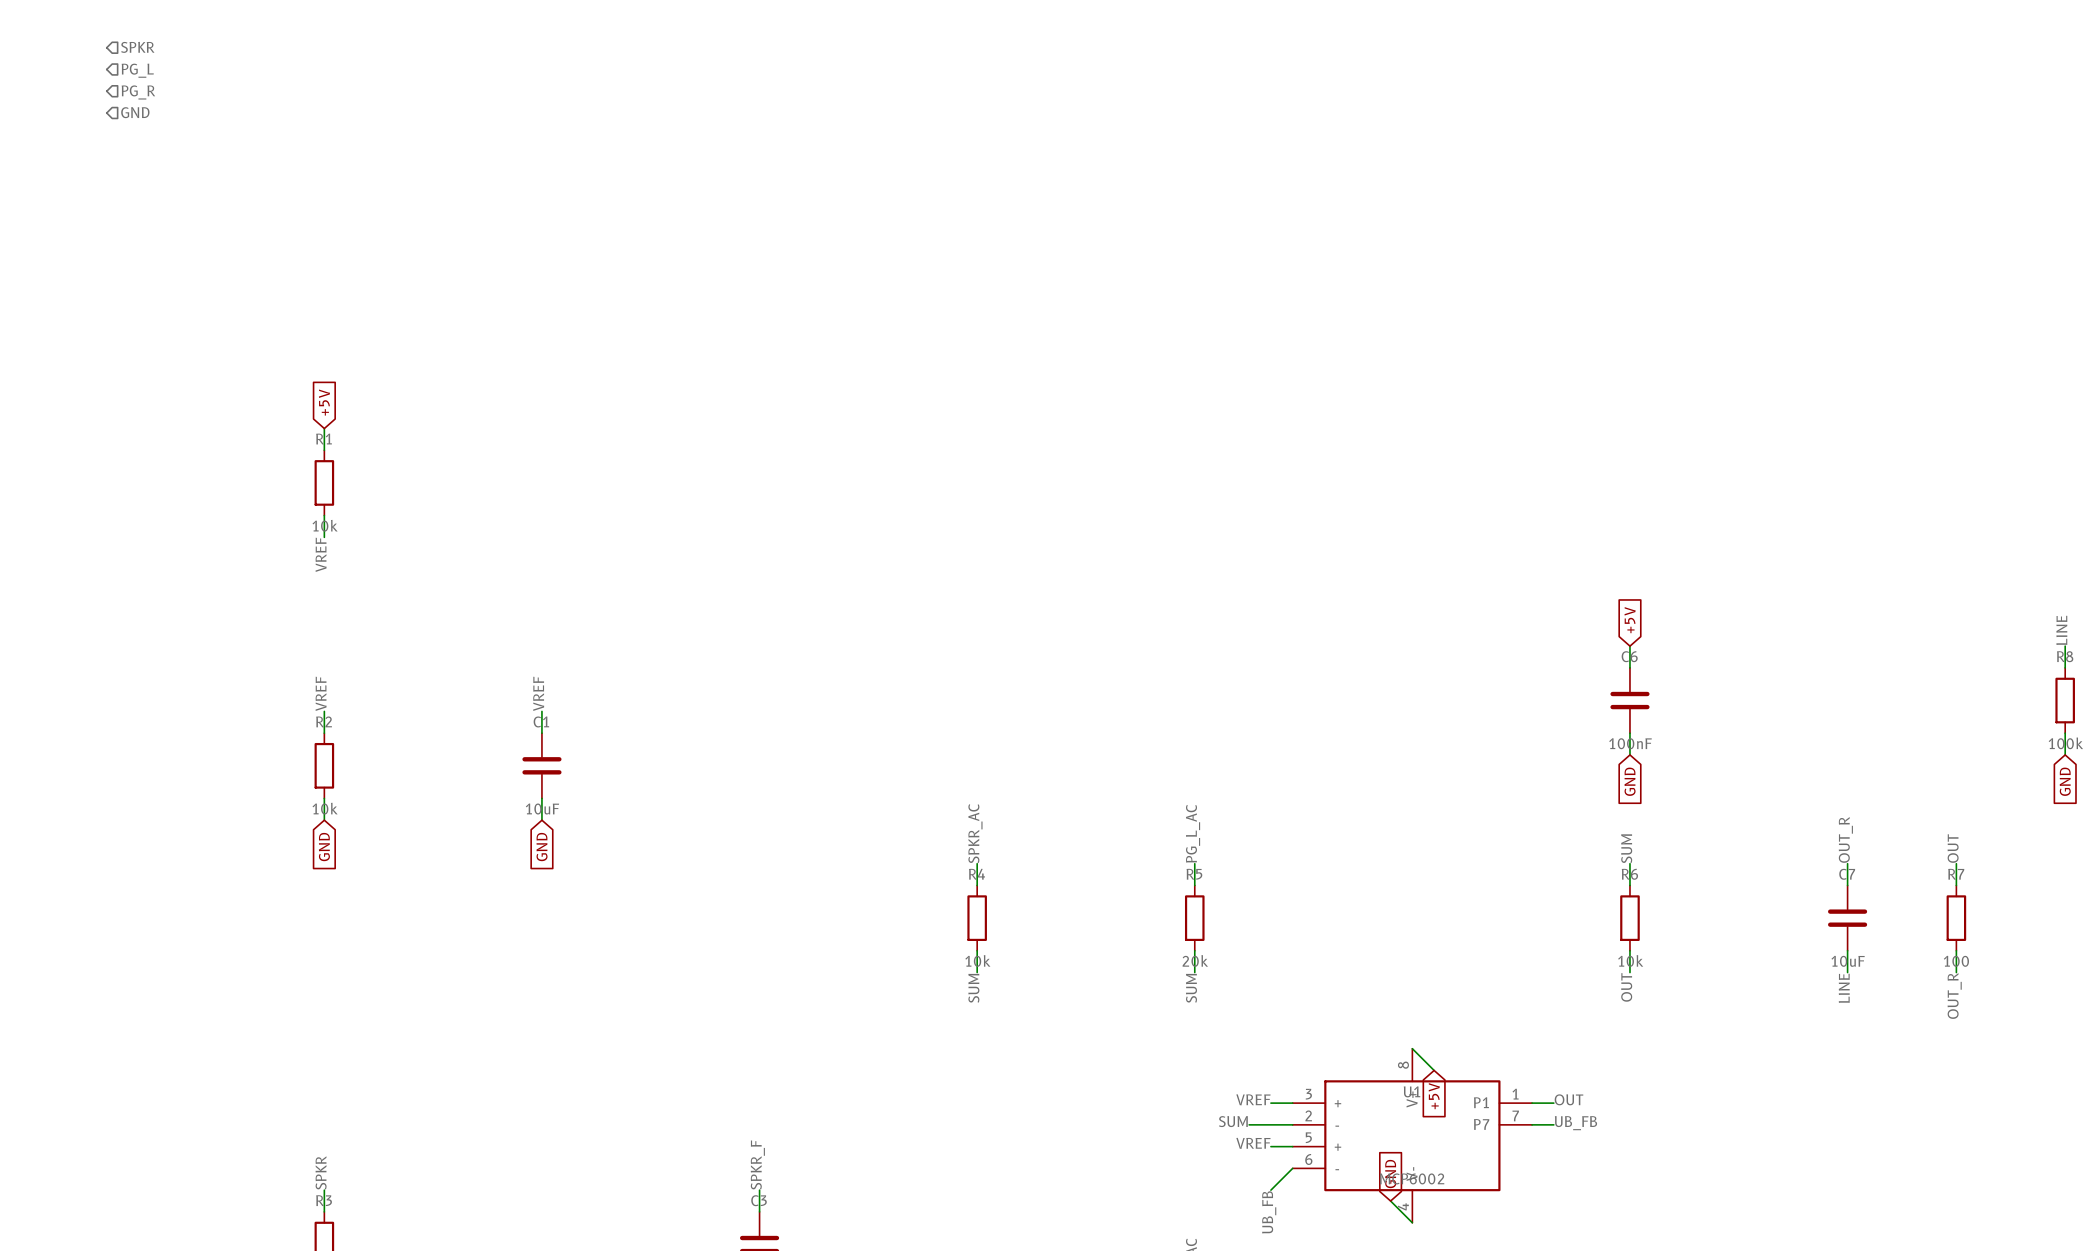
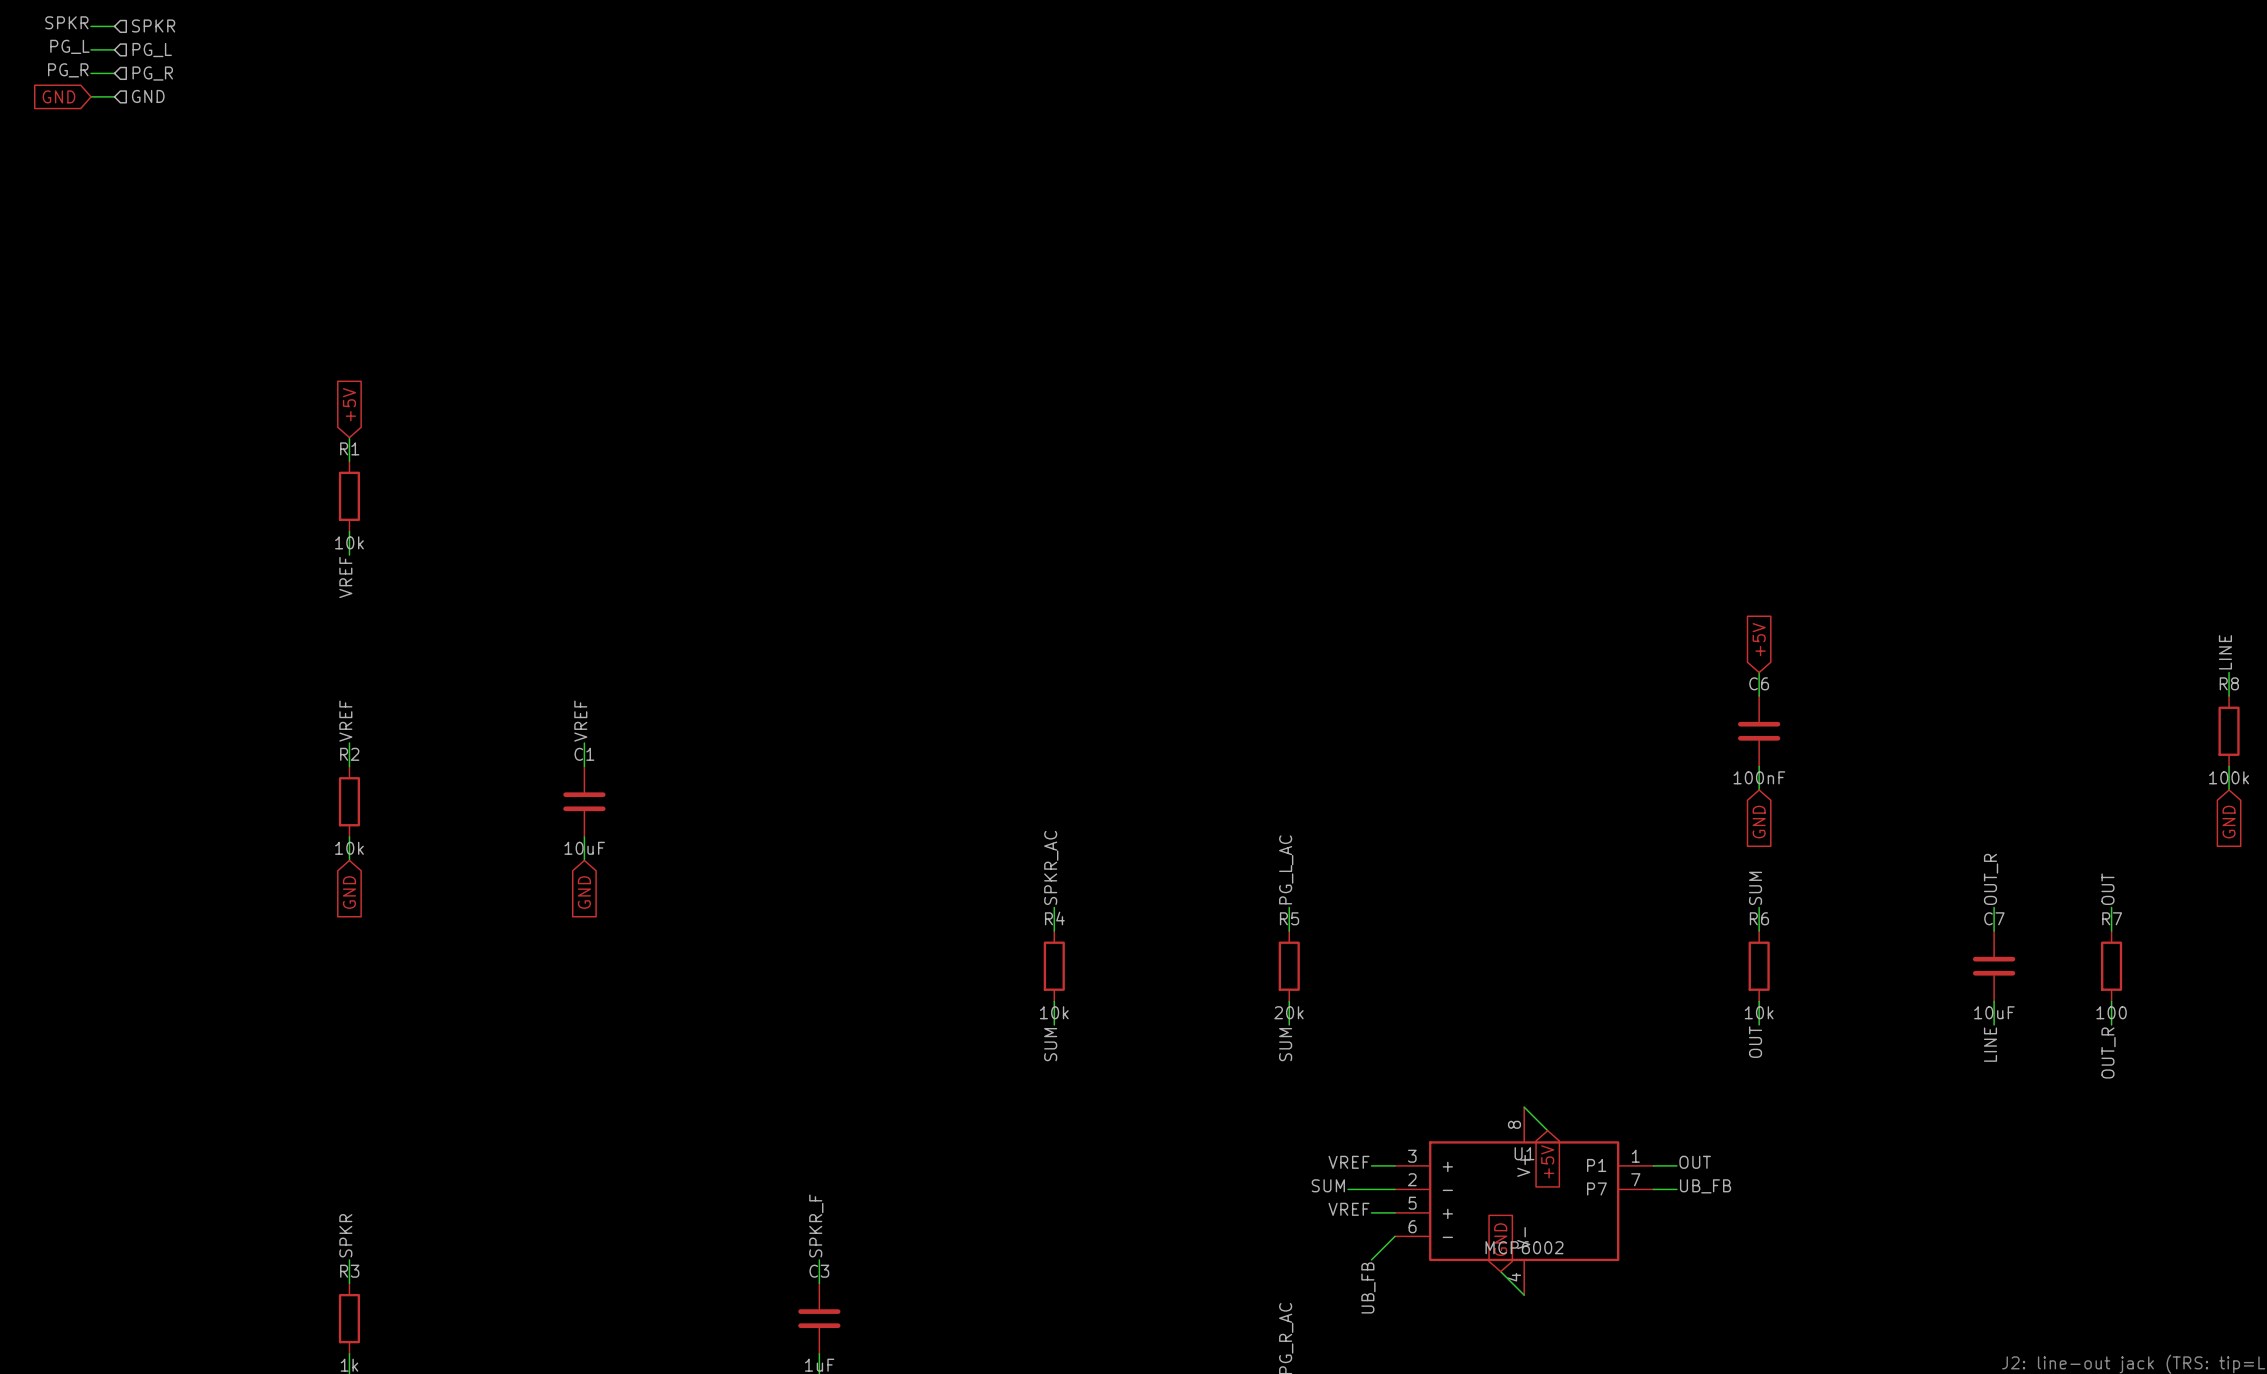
label: none -> SPKR (66, 22)
wire: none -> (91, 26) (114, 26)
label: none -> PG_L (69, 46)
wire: none -> (91, 49) (114, 49)
label: none -> PG_R (68, 70)
wire: none -> (91, 73) (114, 73)
global label: none -> GND (58, 96)
wire: none -> (91, 96) (114, 96)

